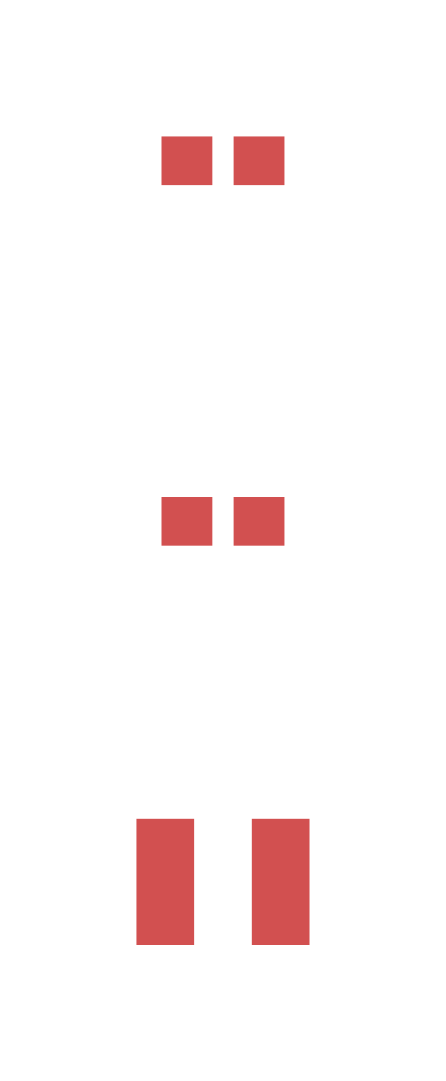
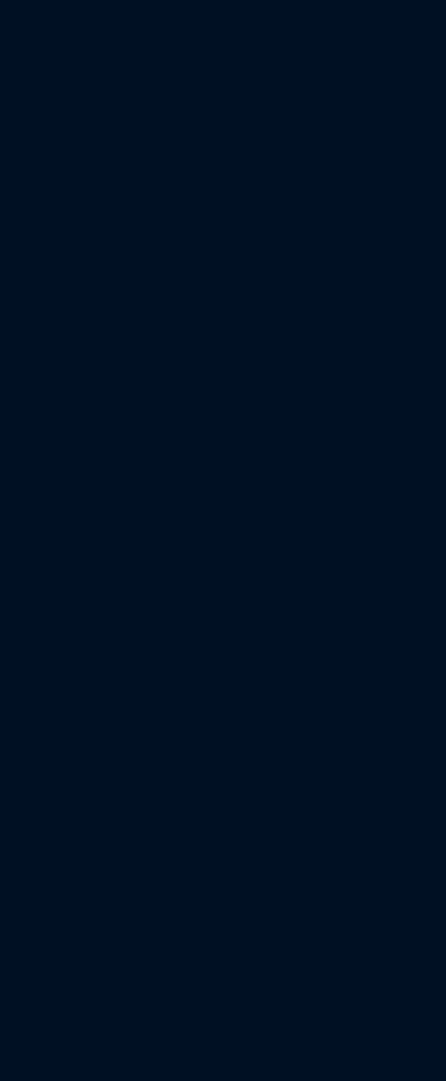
part: (222, 160) -> none
part: (222, 521) -> none
part: (222, 881) -> none

